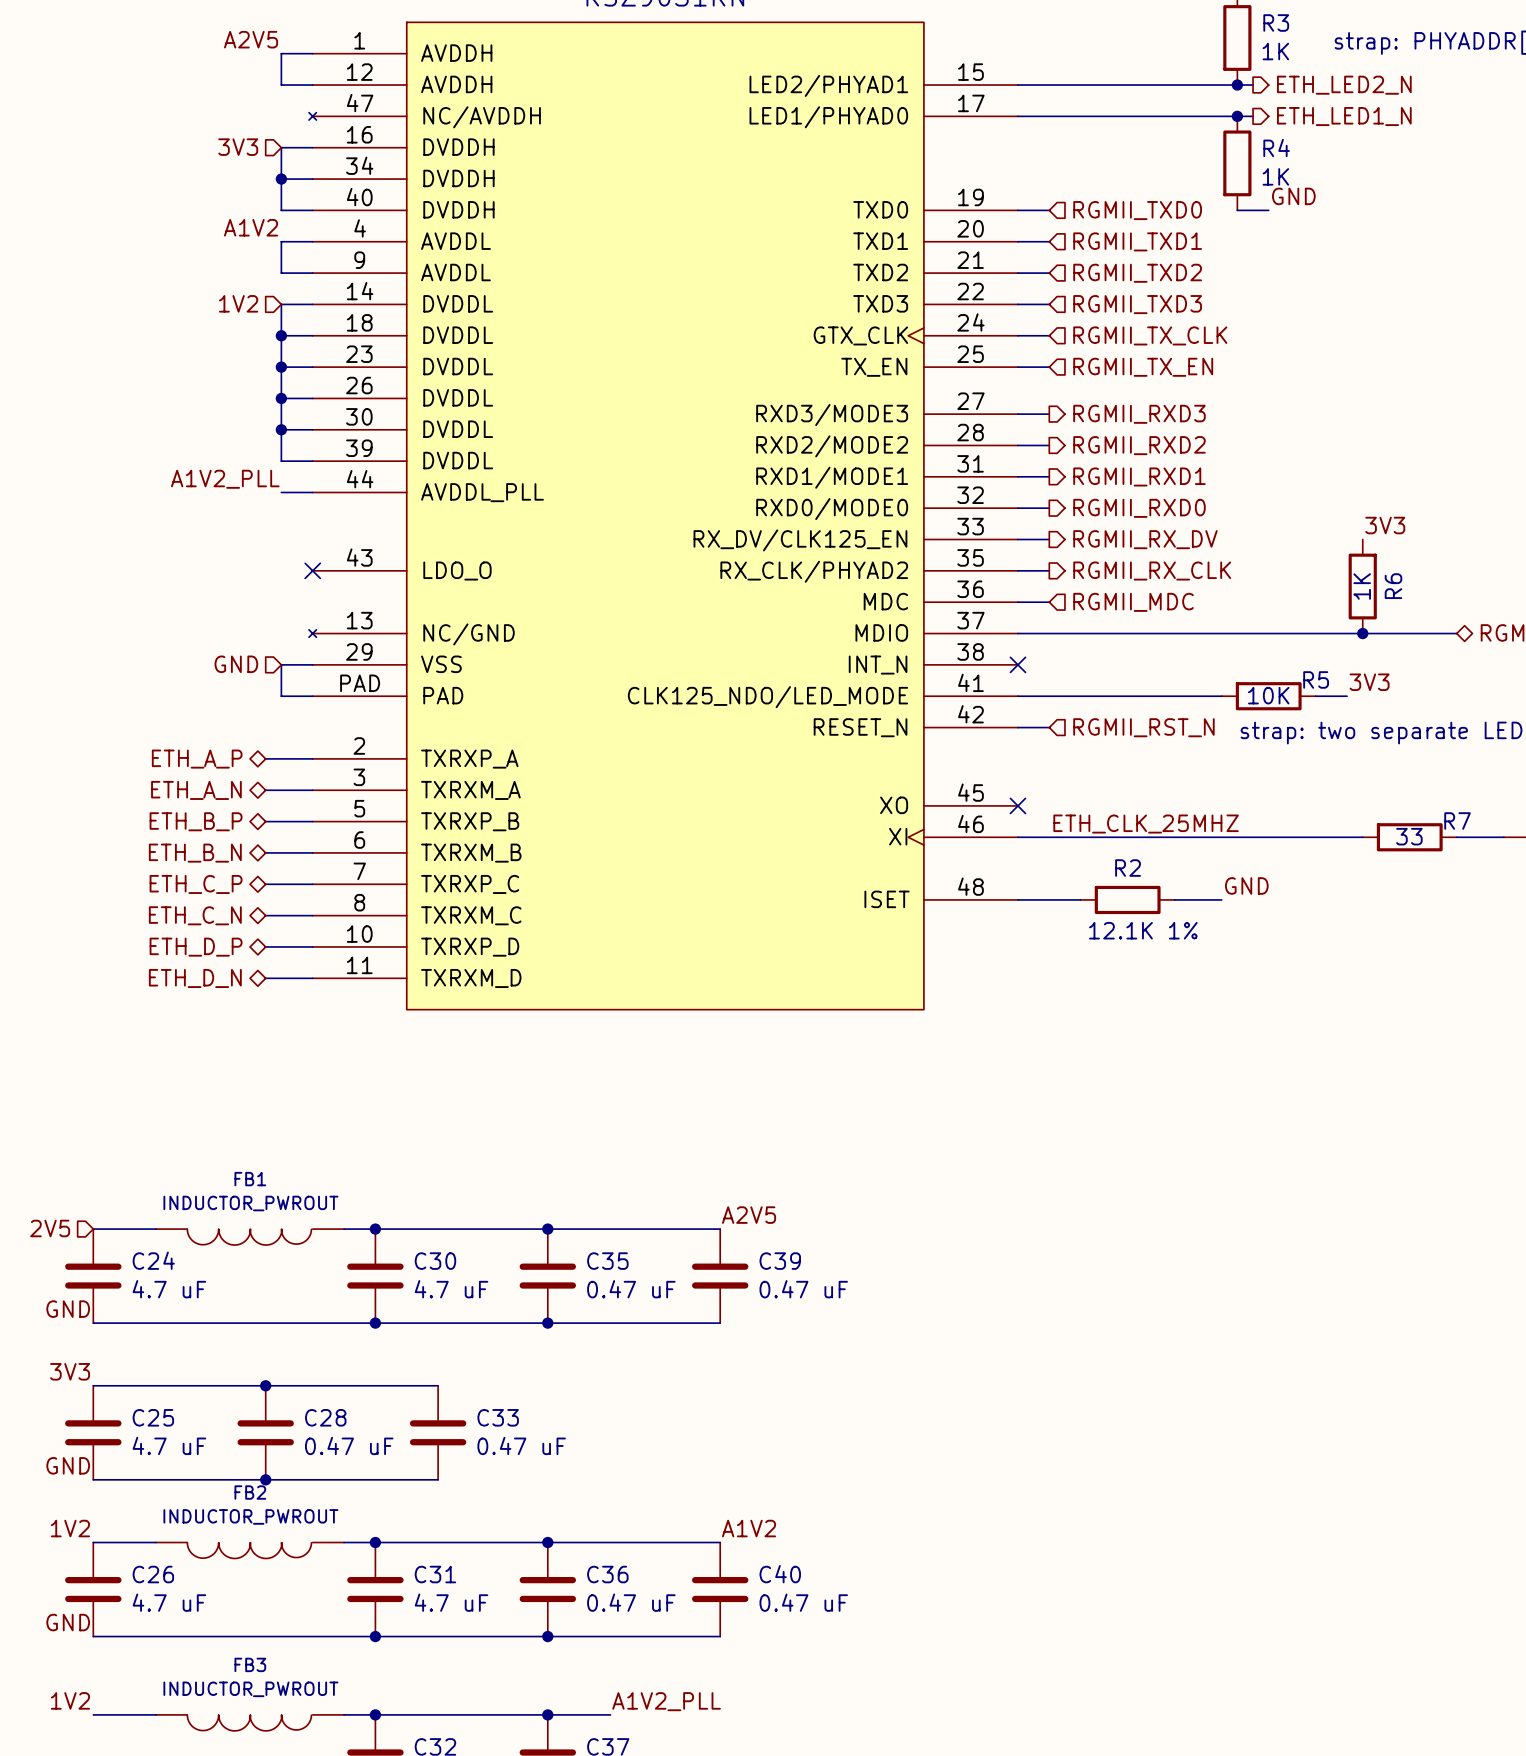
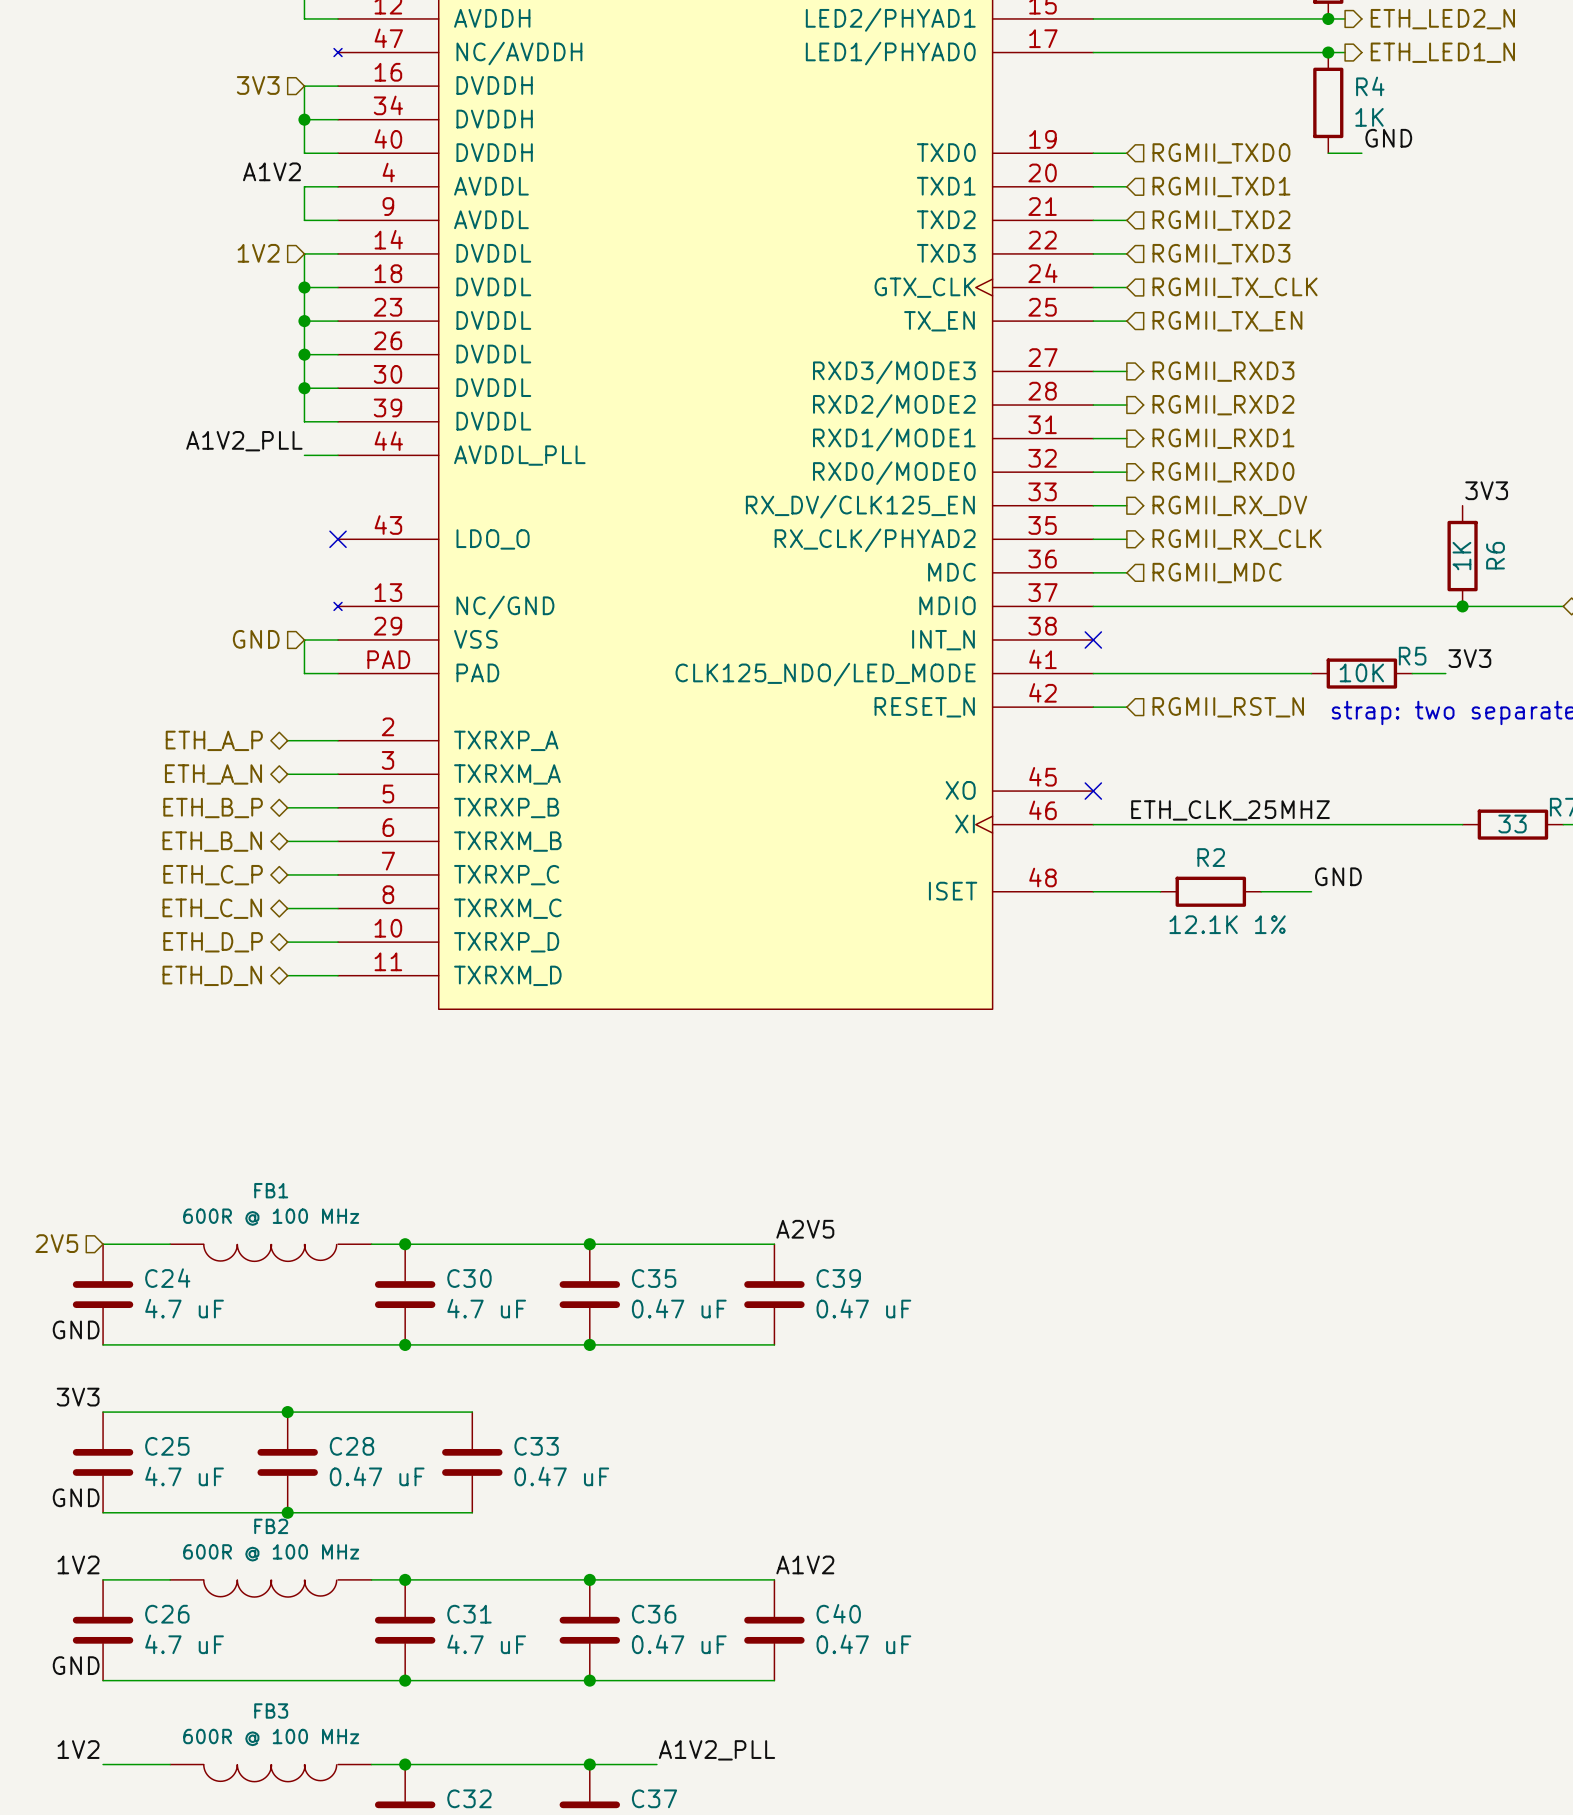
FB1 value: INDUCTOR_PWROUT (250, 1203) -> 600R @ 100 MHz (271, 1217)
FB2 value: INDUCTOR_PWROUT (250, 1516) -> 600R @ 100 MHz (271, 1552)
FB3 value: INDUCTOR_PWROUT (250, 1689) -> 600R @ 100 MHz (271, 1737)

